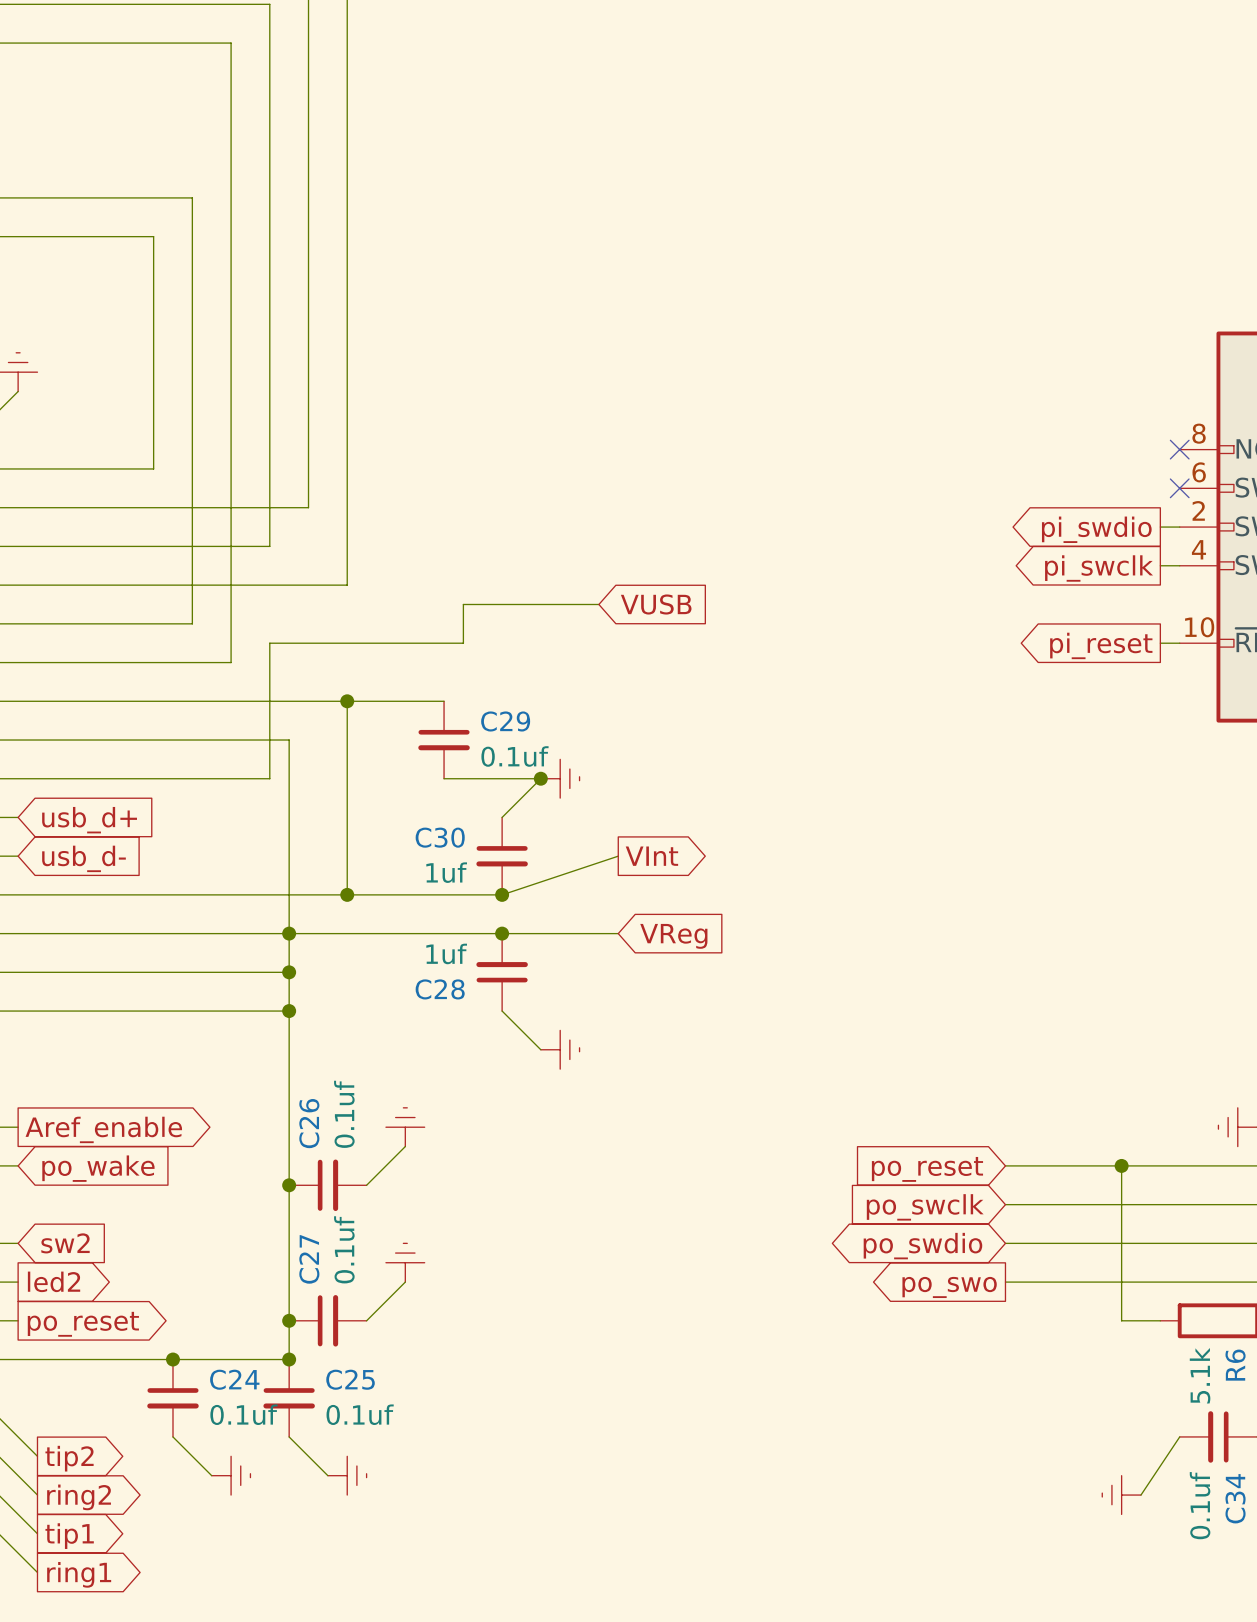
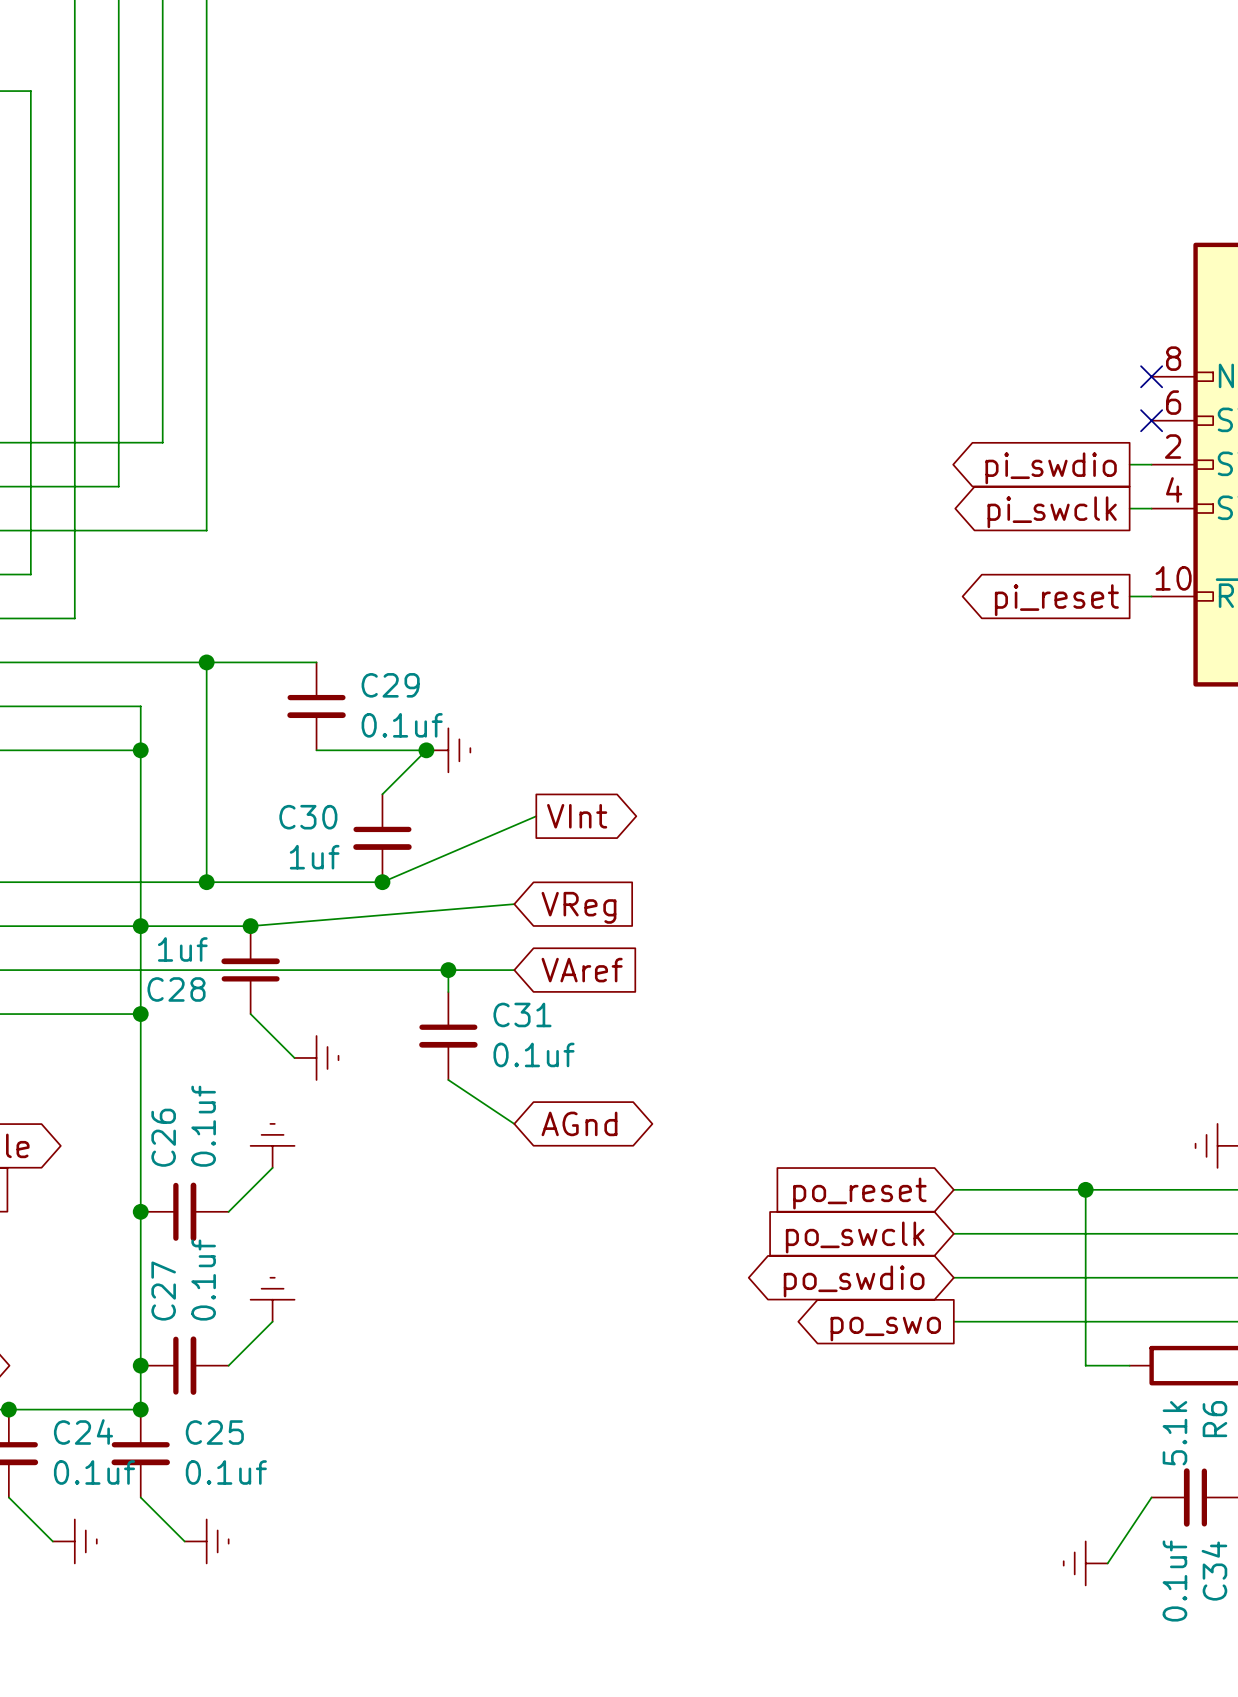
wire: (598, 604) (463, 604) (463, 643) (269, 643) (269, 778) -> (140, 750) (118, 750)
global label: VUSB (656, 604) -> none
junction: none -> (140, 750)
wire: (618, 856) (502, 894) -> (536, 816) (382, 882)
global label position: VInt (651, 856) -> VInt (577, 816)
wire: (385, 933) (618, 933) -> (250, 926) (514, 904)
junction: none -> (250, 926)
junction: (502, 933) -> none
global label position: VReg (673, 936) -> VReg (578, 907)
wire: none -> (140, 970) (514, 970)
junction: (289, 972) -> none
C28 position: (502, 972) -> (250, 970)
wire: none -> (448, 970) (448, 992)
junction: none -> (448, 970)
global label: none -> VAref (582, 970)
wire: (502, 1011) (540, 1049) -> (250, 1014) (294, 1057)
C31: none -> 0.1uf (448, 1036)
power symbol position: (560, 1049) -> (316, 1057)
wire: none -> (448, 1079) (514, 1123)
global label: none -> AGnd (579, 1123)

